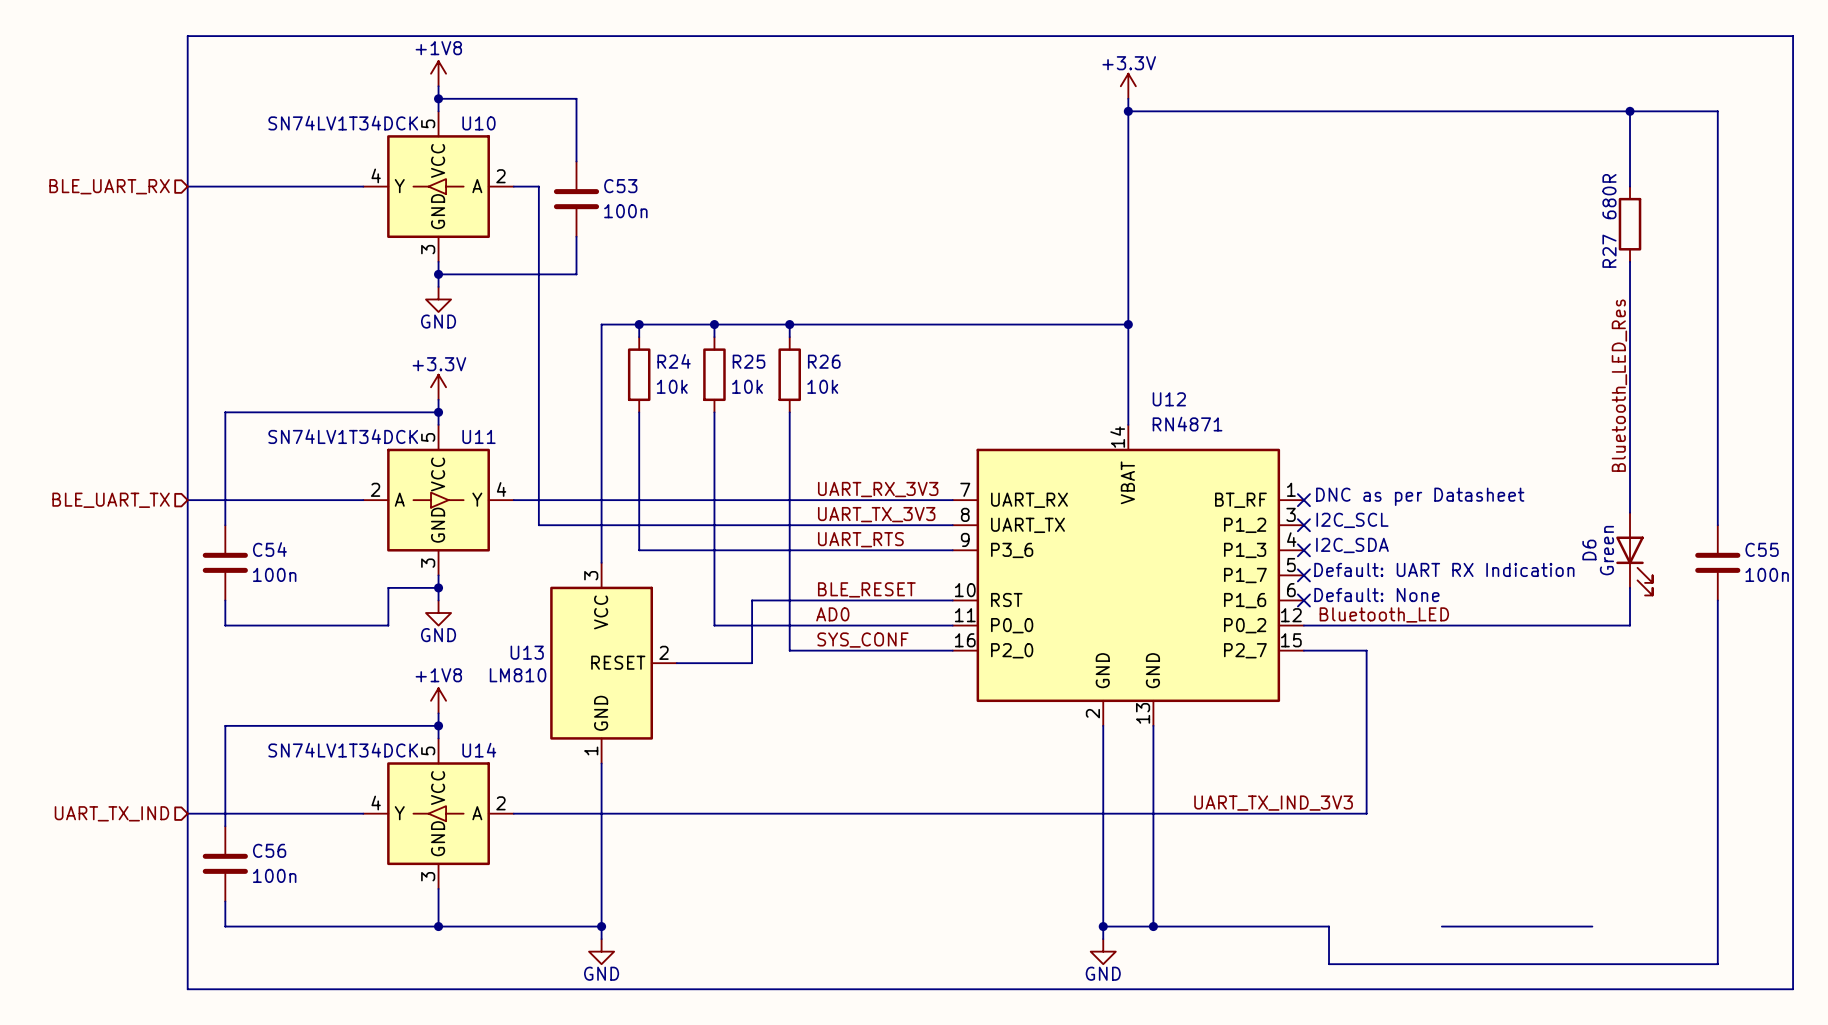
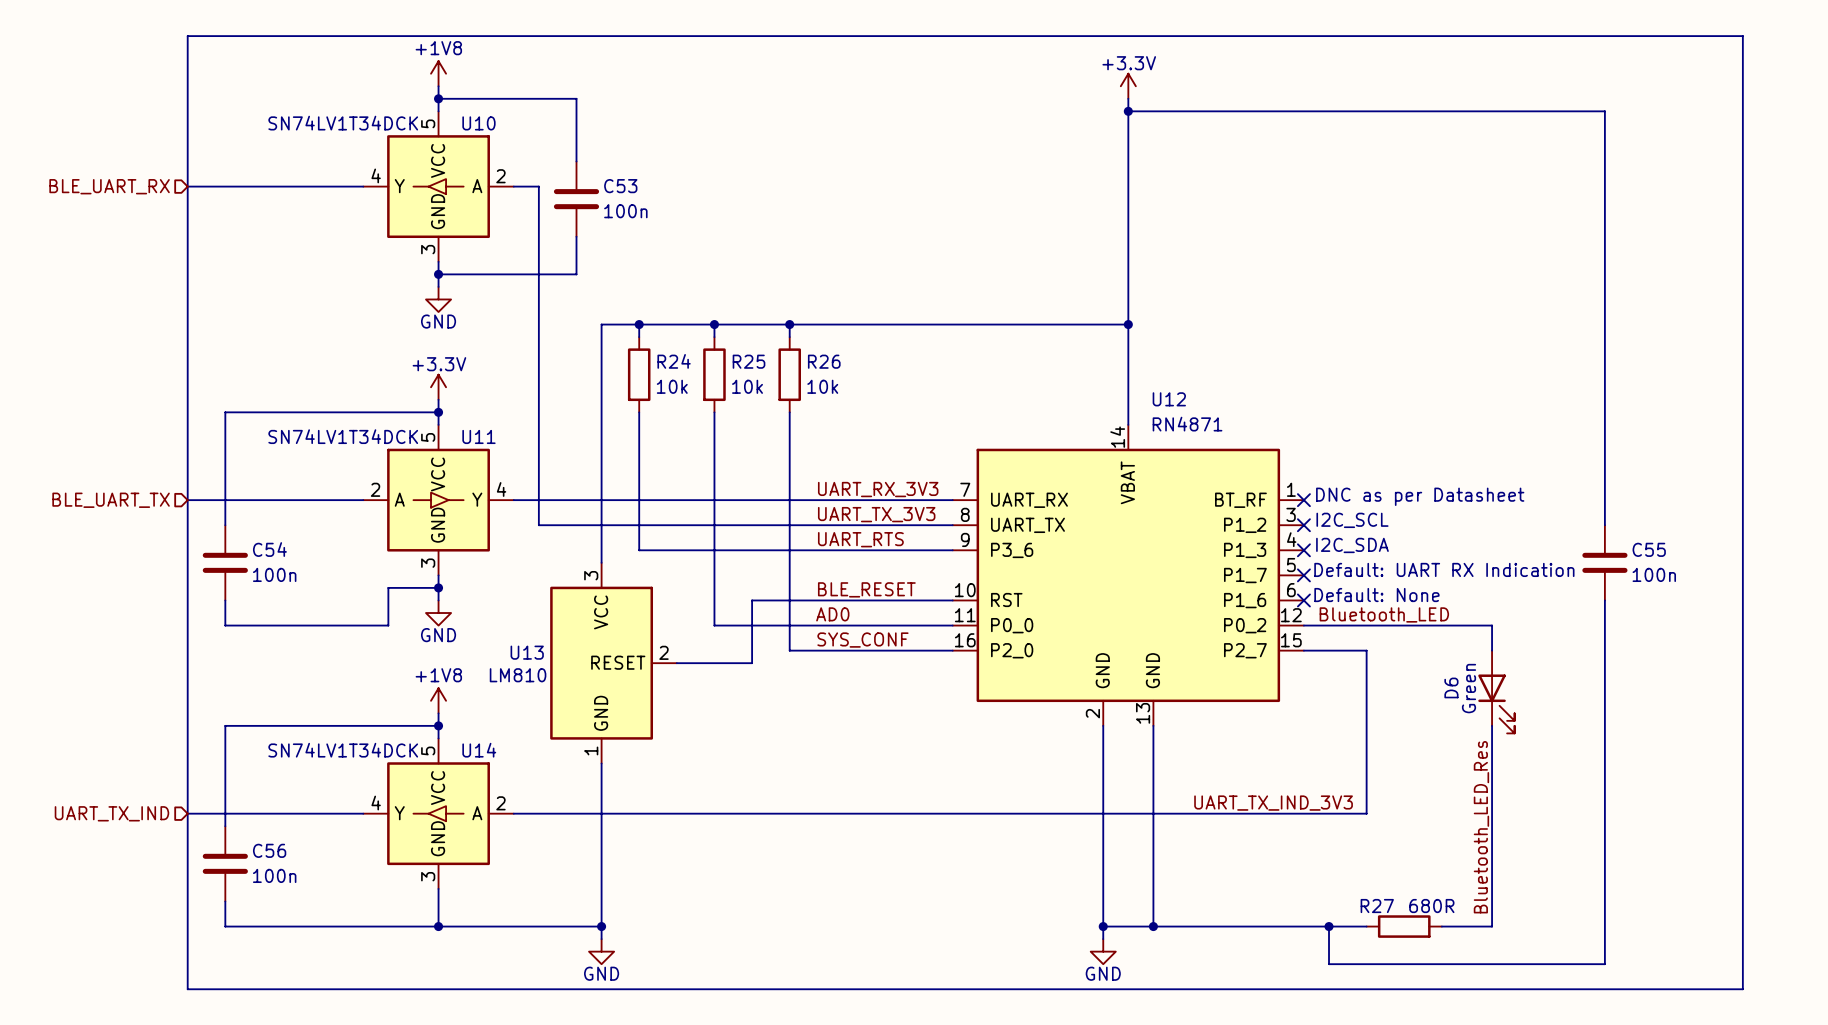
line: (1742, 36) (1793, 36) (1793, 989) (1742, 989) -> (1742, 36) (1742, 989)
wire: (1604, 111) (1717, 111) (1717, 525) -> (1604, 111) (1604, 525)
wire: (1630, 111) (1630, 186) -> none
junction: (1630, 111) -> none
R27 rotation: 0° (1630, 224) -> 90° clockwise (1404, 926)
R27 position: (1630, 224) -> (1404, 926)
wire: (1630, 261) (1630, 512) -> none
label: Bluetooth_LED_Res (1619, 385) -> none
D6 position: (1634, 554) -> (1496, 692)
C55 position: (1717, 562) -> (1604, 562)
wire: (1630, 587) (1630, 625) (1492, 625) -> (1492, 650) (1492, 625)
wire: (1717, 600) (1717, 964) (1604, 964) -> (1604, 600) (1604, 964)
label: none -> Bluetooth_LED_Res (1481, 827)
wire: none -> (1329, 926) (1366, 926)
junction: none -> (1329, 926)
wire: (1492, 926) (1592, 926) -> (1492, 926) (1492, 725)

